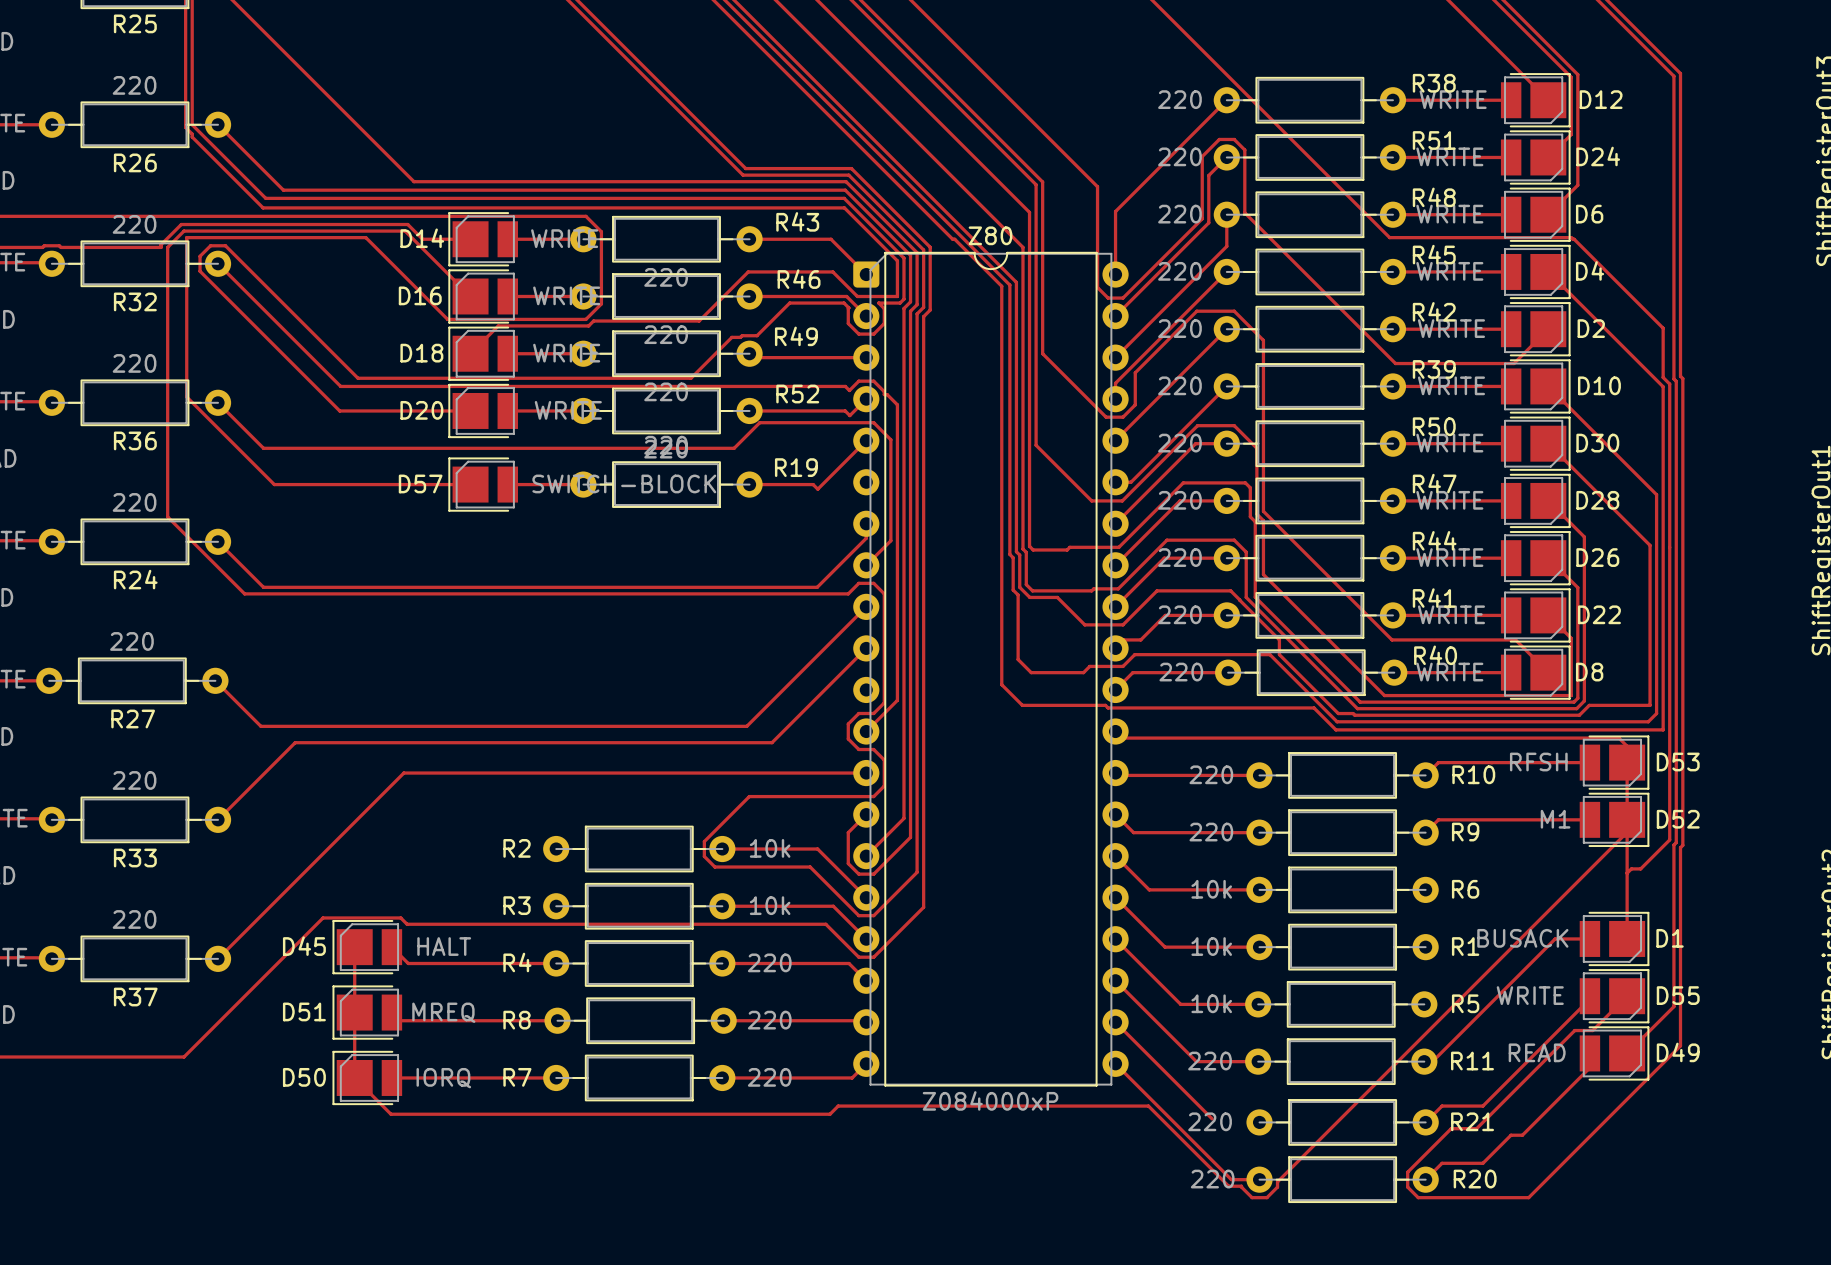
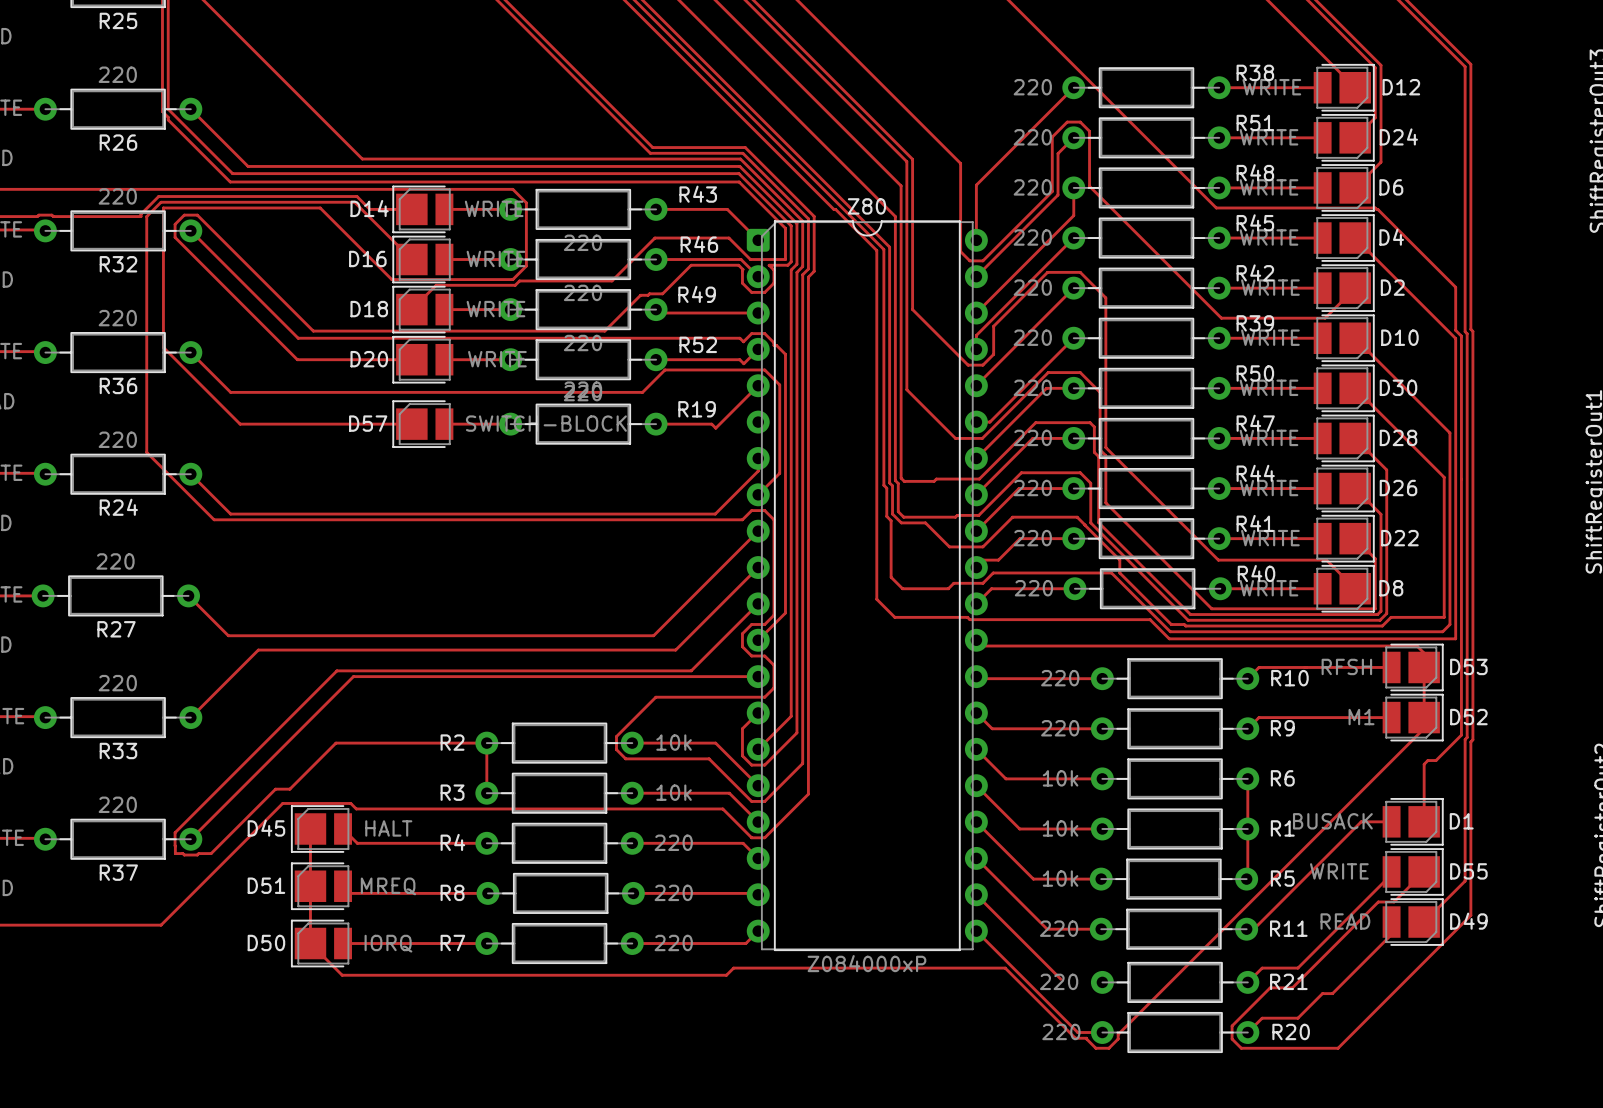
track: none -> (758, 603) (691, 670) (336, 670) (175, 832) (175, 853) (211, 853) (275, 789) (289, 789) (335, 743) (486, 743) (486, 793)
track: (1627, 832) (1627, 873) -> none
track: none -> (1247, 778) (1247, 877)

